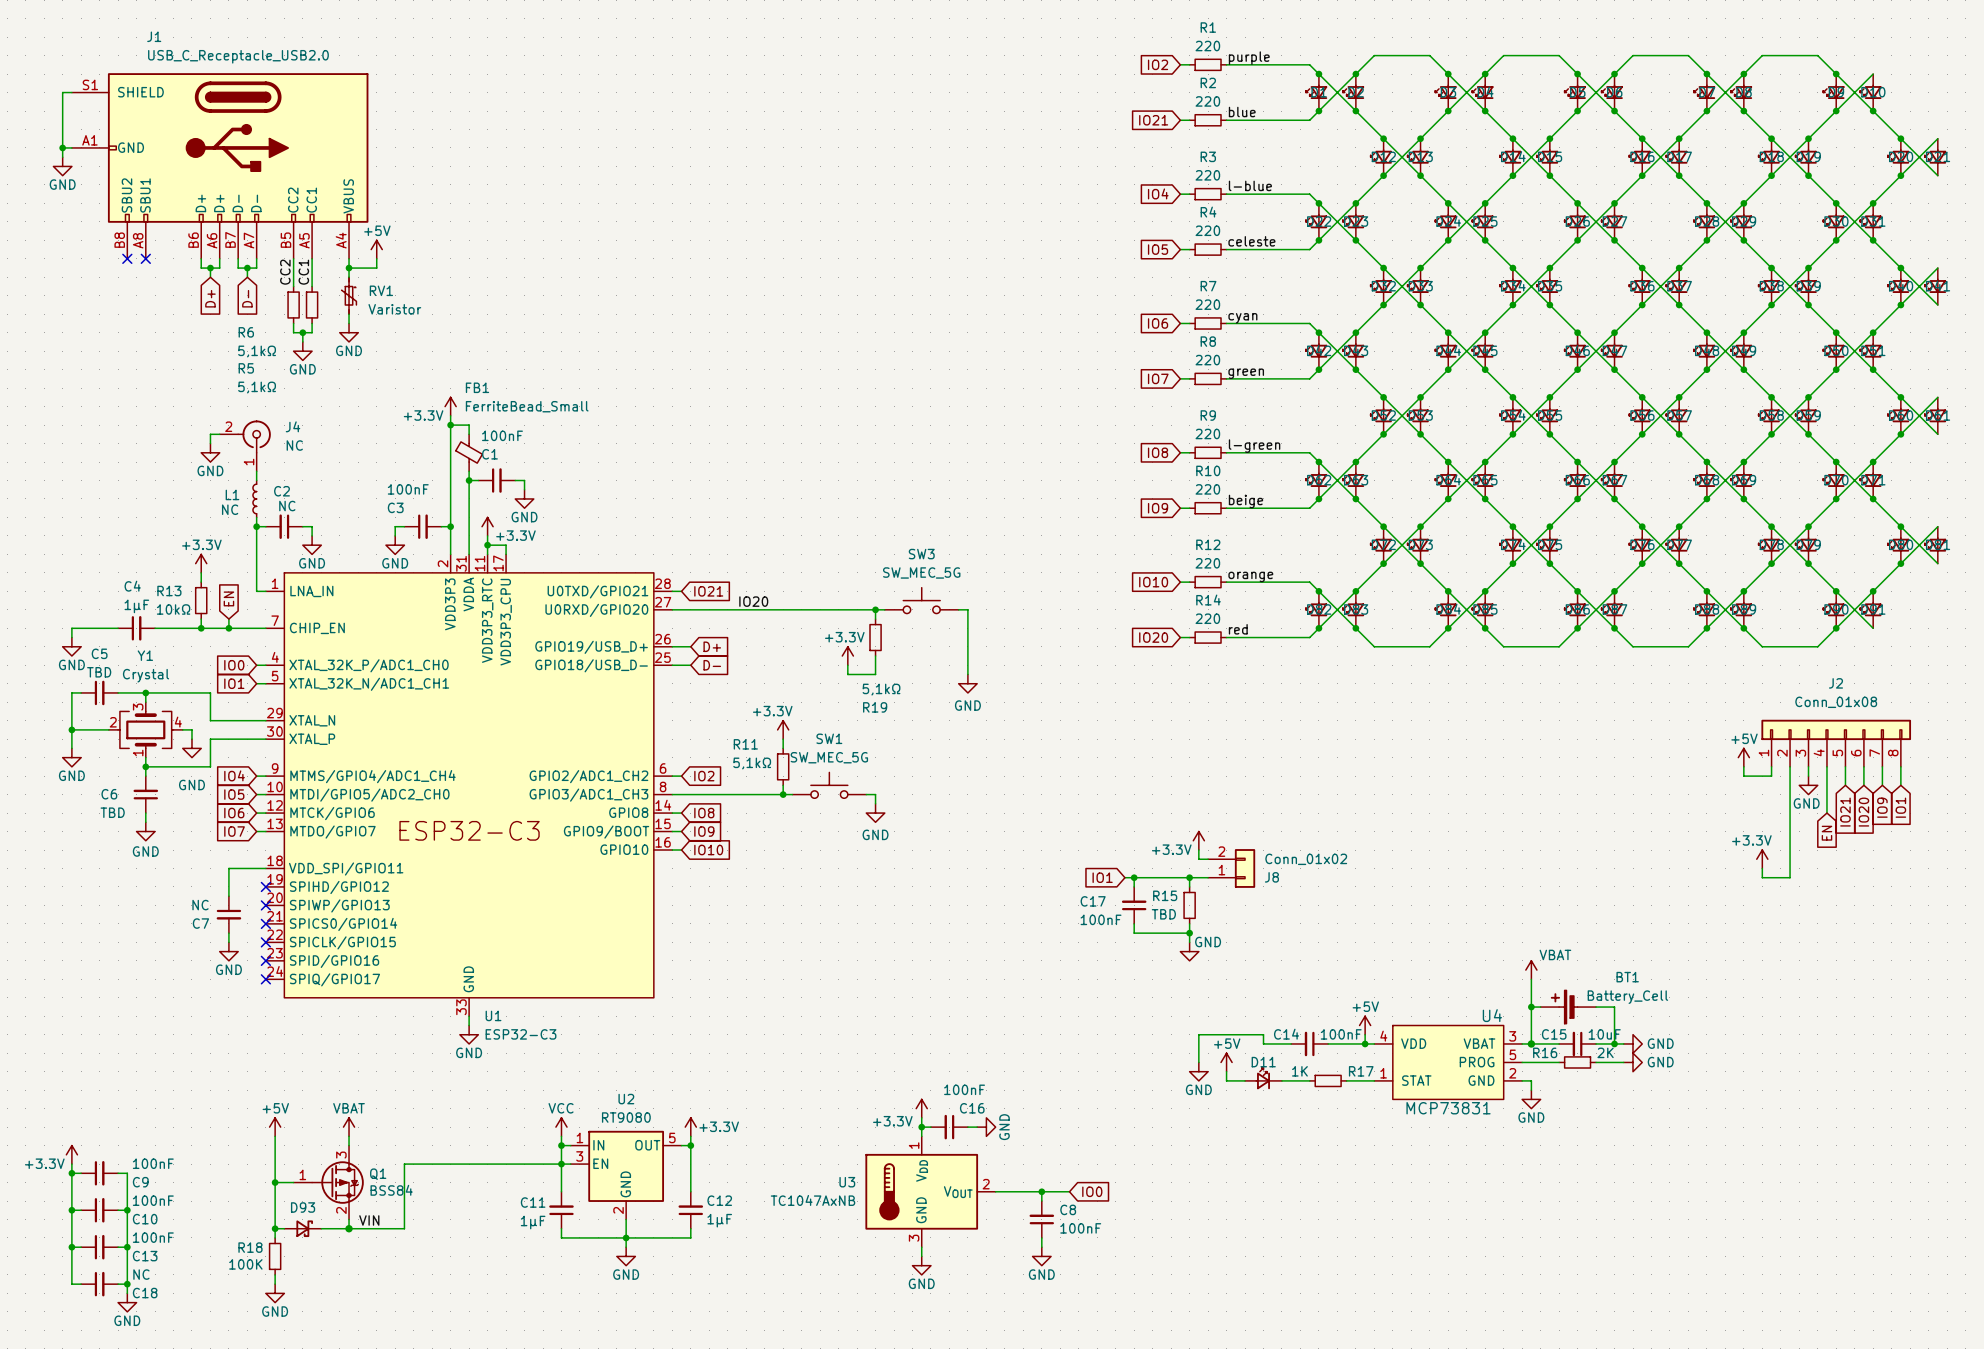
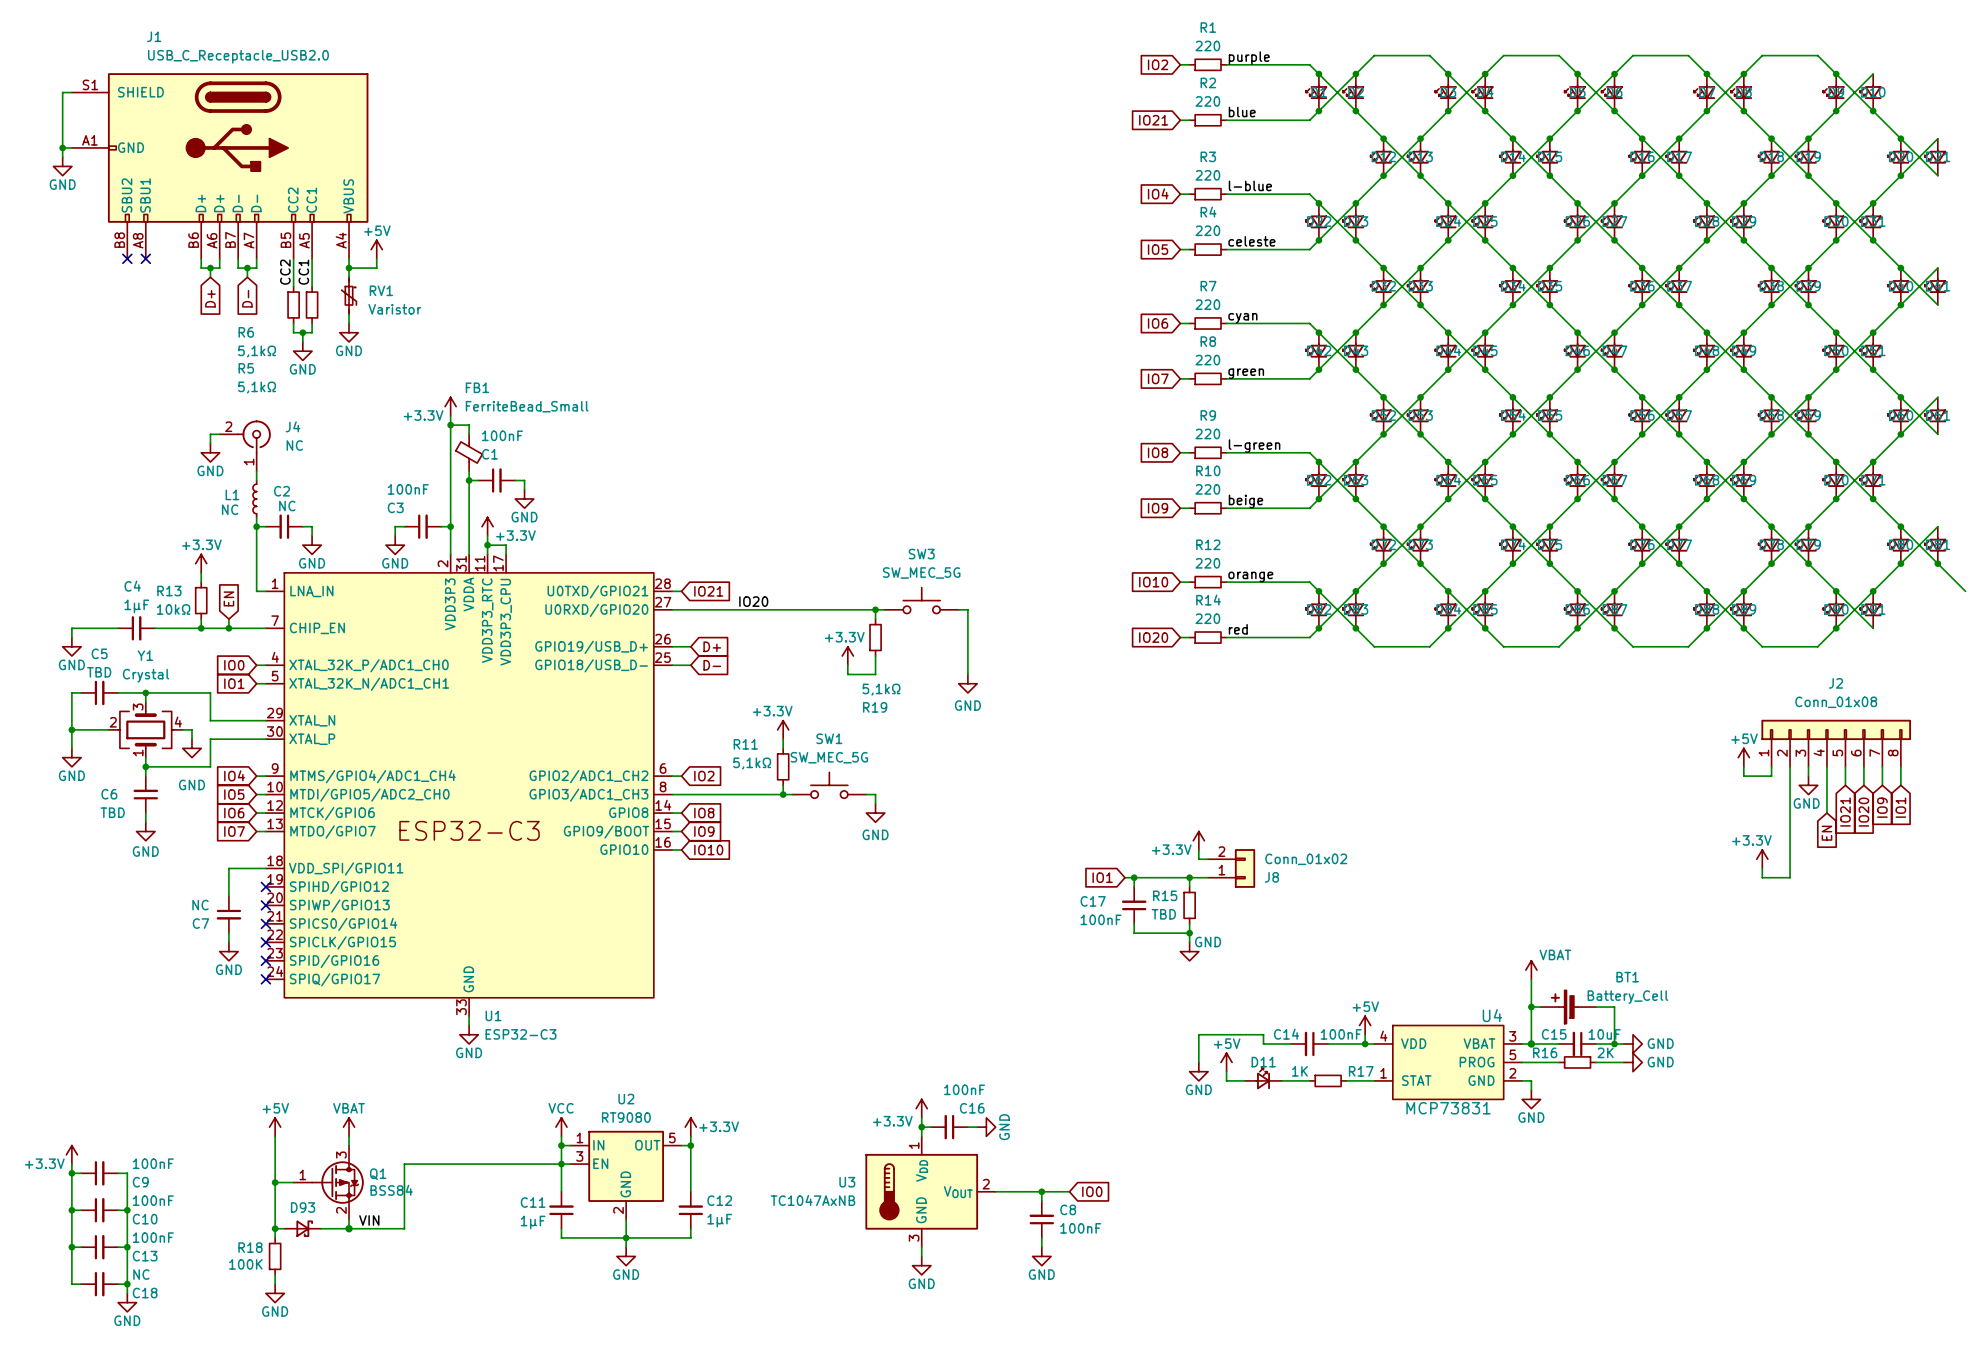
wire: none -> (1937, 563) (1965, 591)
junction: none -> (1937, 563)

